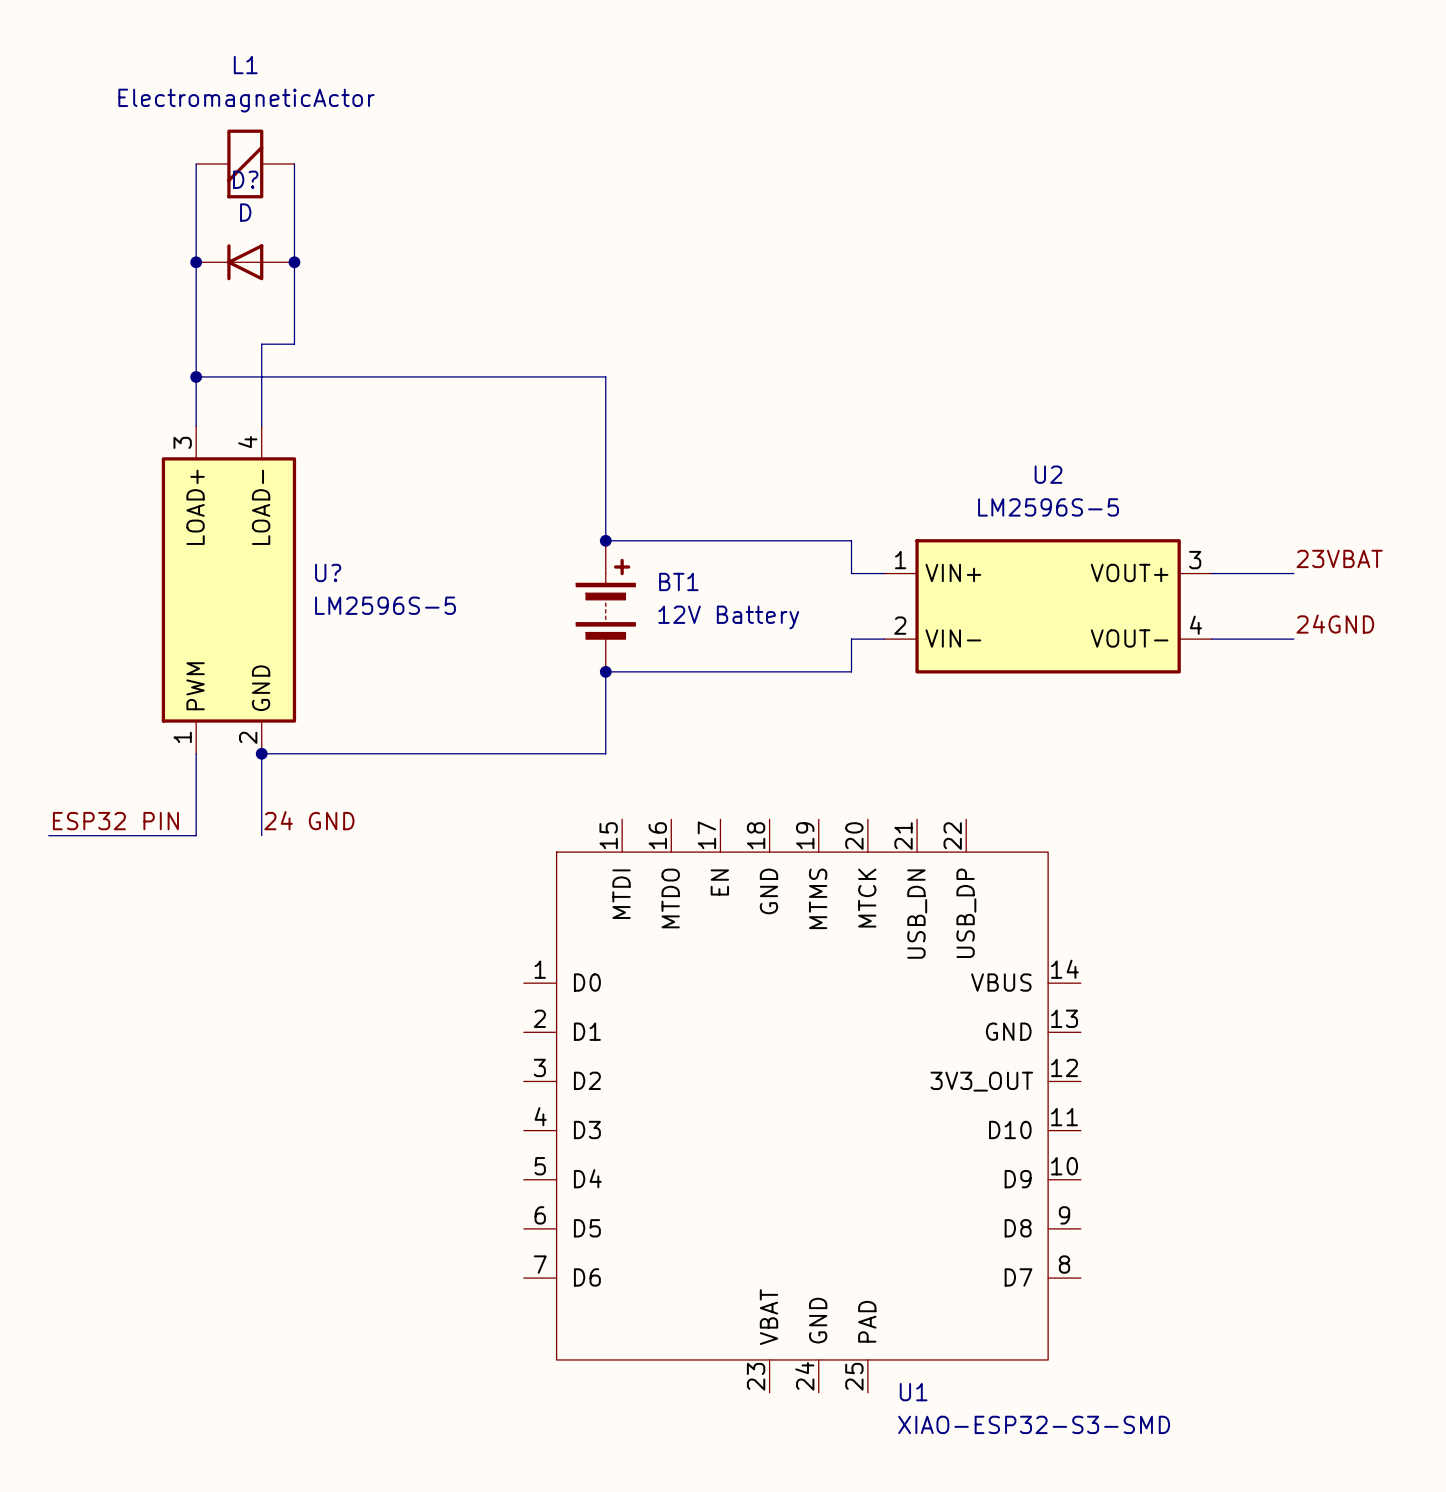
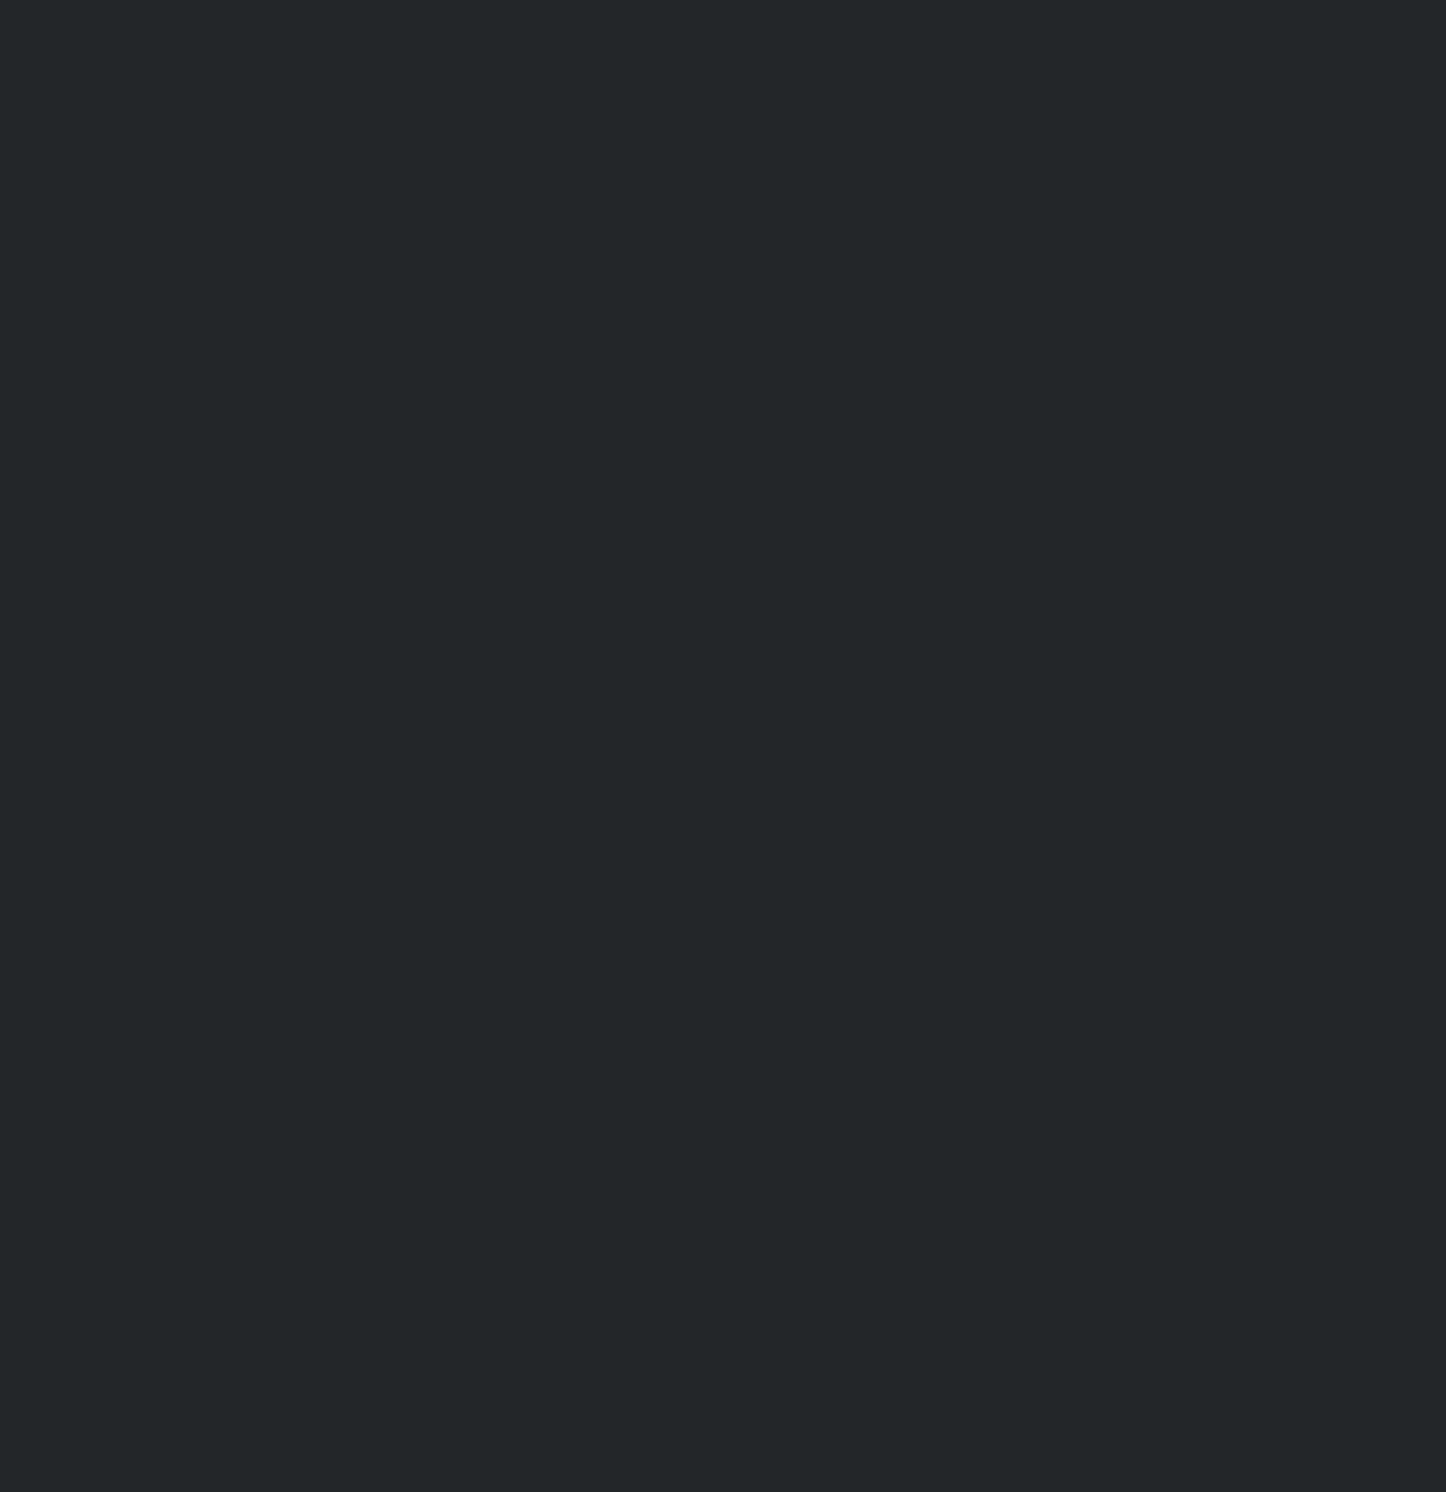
wire: (196, 163) (196, 426) -> none
L1: ElectromagneticActor (245, 163) -> none
wire: (294, 163) (294, 344) (261, 344) (261, 426) -> none
junction: (196, 262) -> none
D?: D (245, 262) -> none
junction: (294, 262) -> none
wire: (196, 376) (605, 376) (605, 540) (851, 540) (851, 573) (884, 573) -> none
junction: (196, 376) -> none
junction: (605, 540) -> none
label: 23VBAT (1339, 558) -> none
wire: (1211, 573) (1293, 573) -> none
U?: LM2596S-5 (228, 589) -> none
BT1: 12V Battery (605, 606) -> none
U2: LM2596S-5 (1048, 606) -> none
label: 24GND (1335, 624) -> none
wire: (884, 639) (851, 639) (851, 671) (605, 671) (605, 753) (261, 753) (261, 835) -> none
wire: (1211, 639) (1293, 639) -> none
junction: (605, 671) -> none
wire: (196, 753) (196, 835) (48, 835) -> none
junction: (261, 753) -> none
label: 24 GND (309, 820) -> none
label: ESP32 PIN (115, 821) -> none
U1: XIAO-ESP32-S3-SMD (802, 1106) -> none

